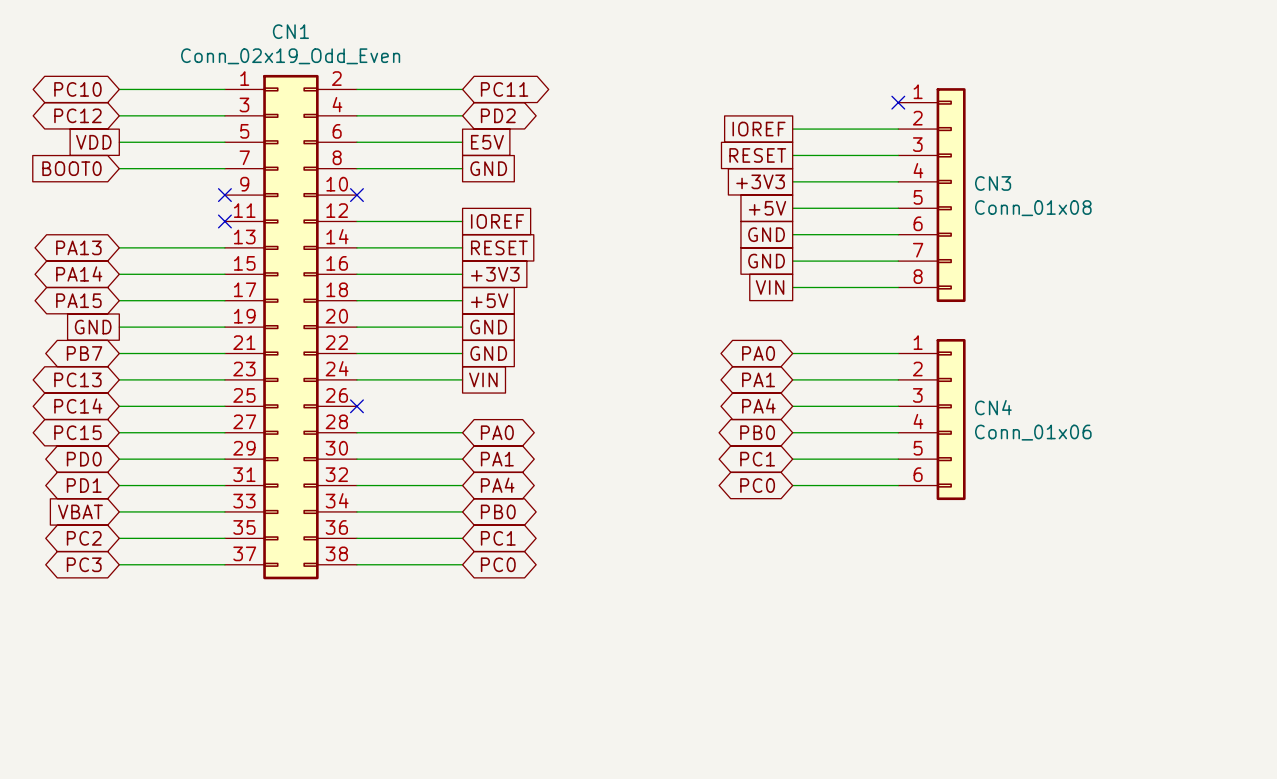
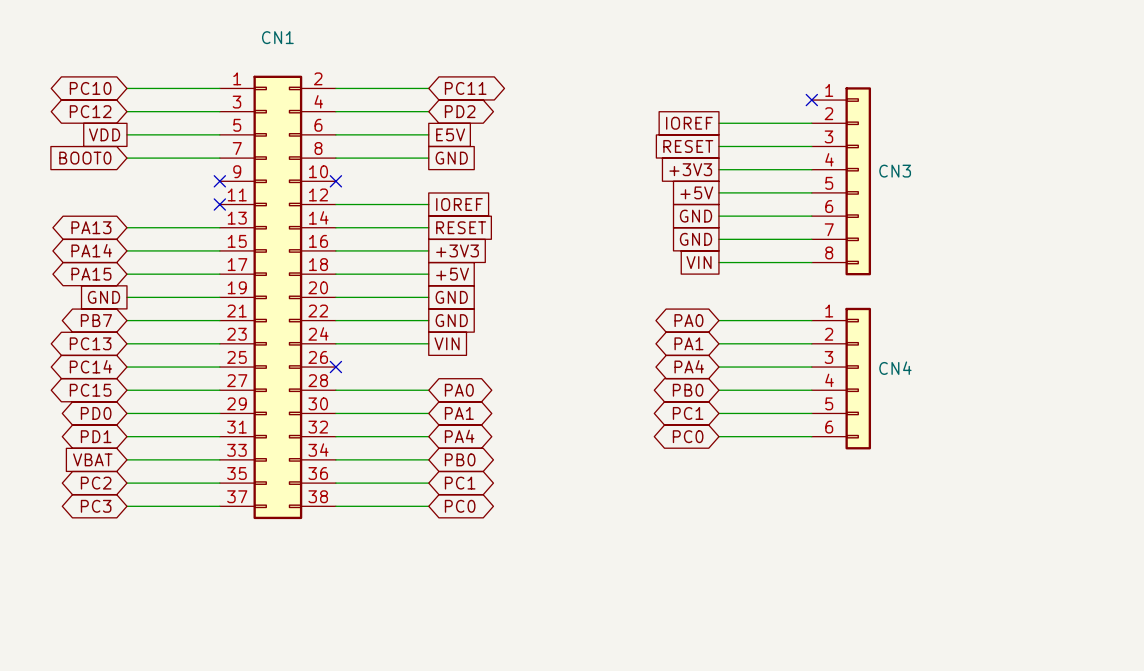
CN1 value: Conn_02x19_Odd_Even (290, 56) -> none
CN3 value: Conn_01x08 (1033, 208) -> none
CN4 value: Conn_01x06 (1033, 432) -> none

